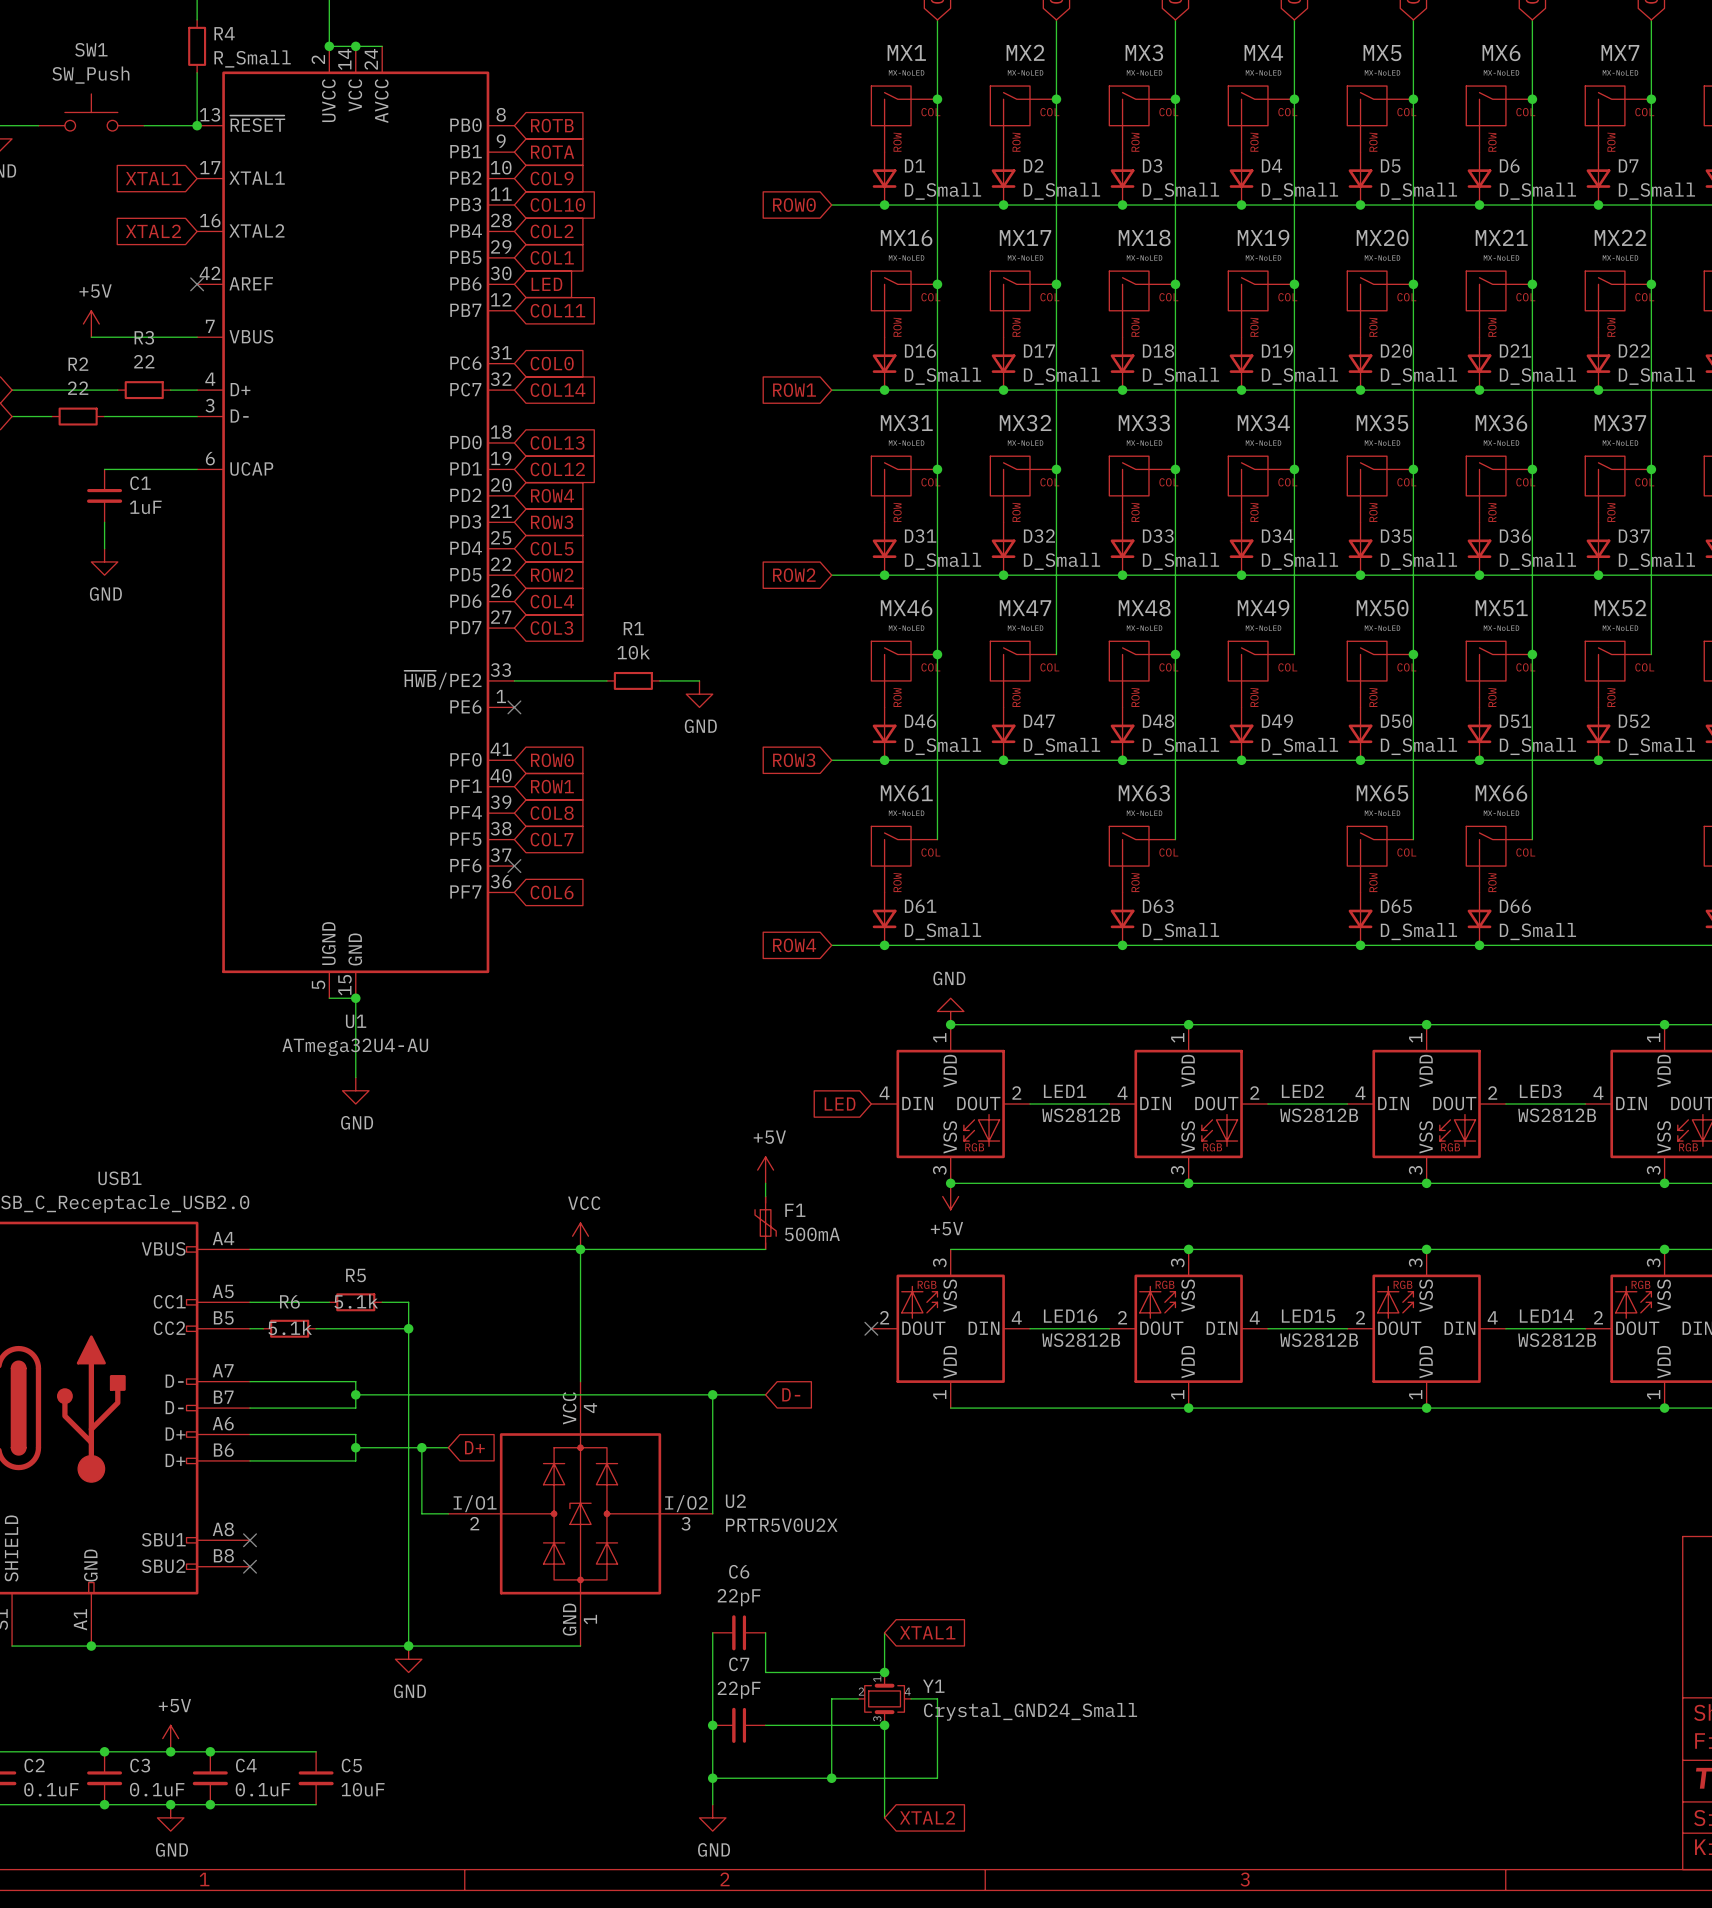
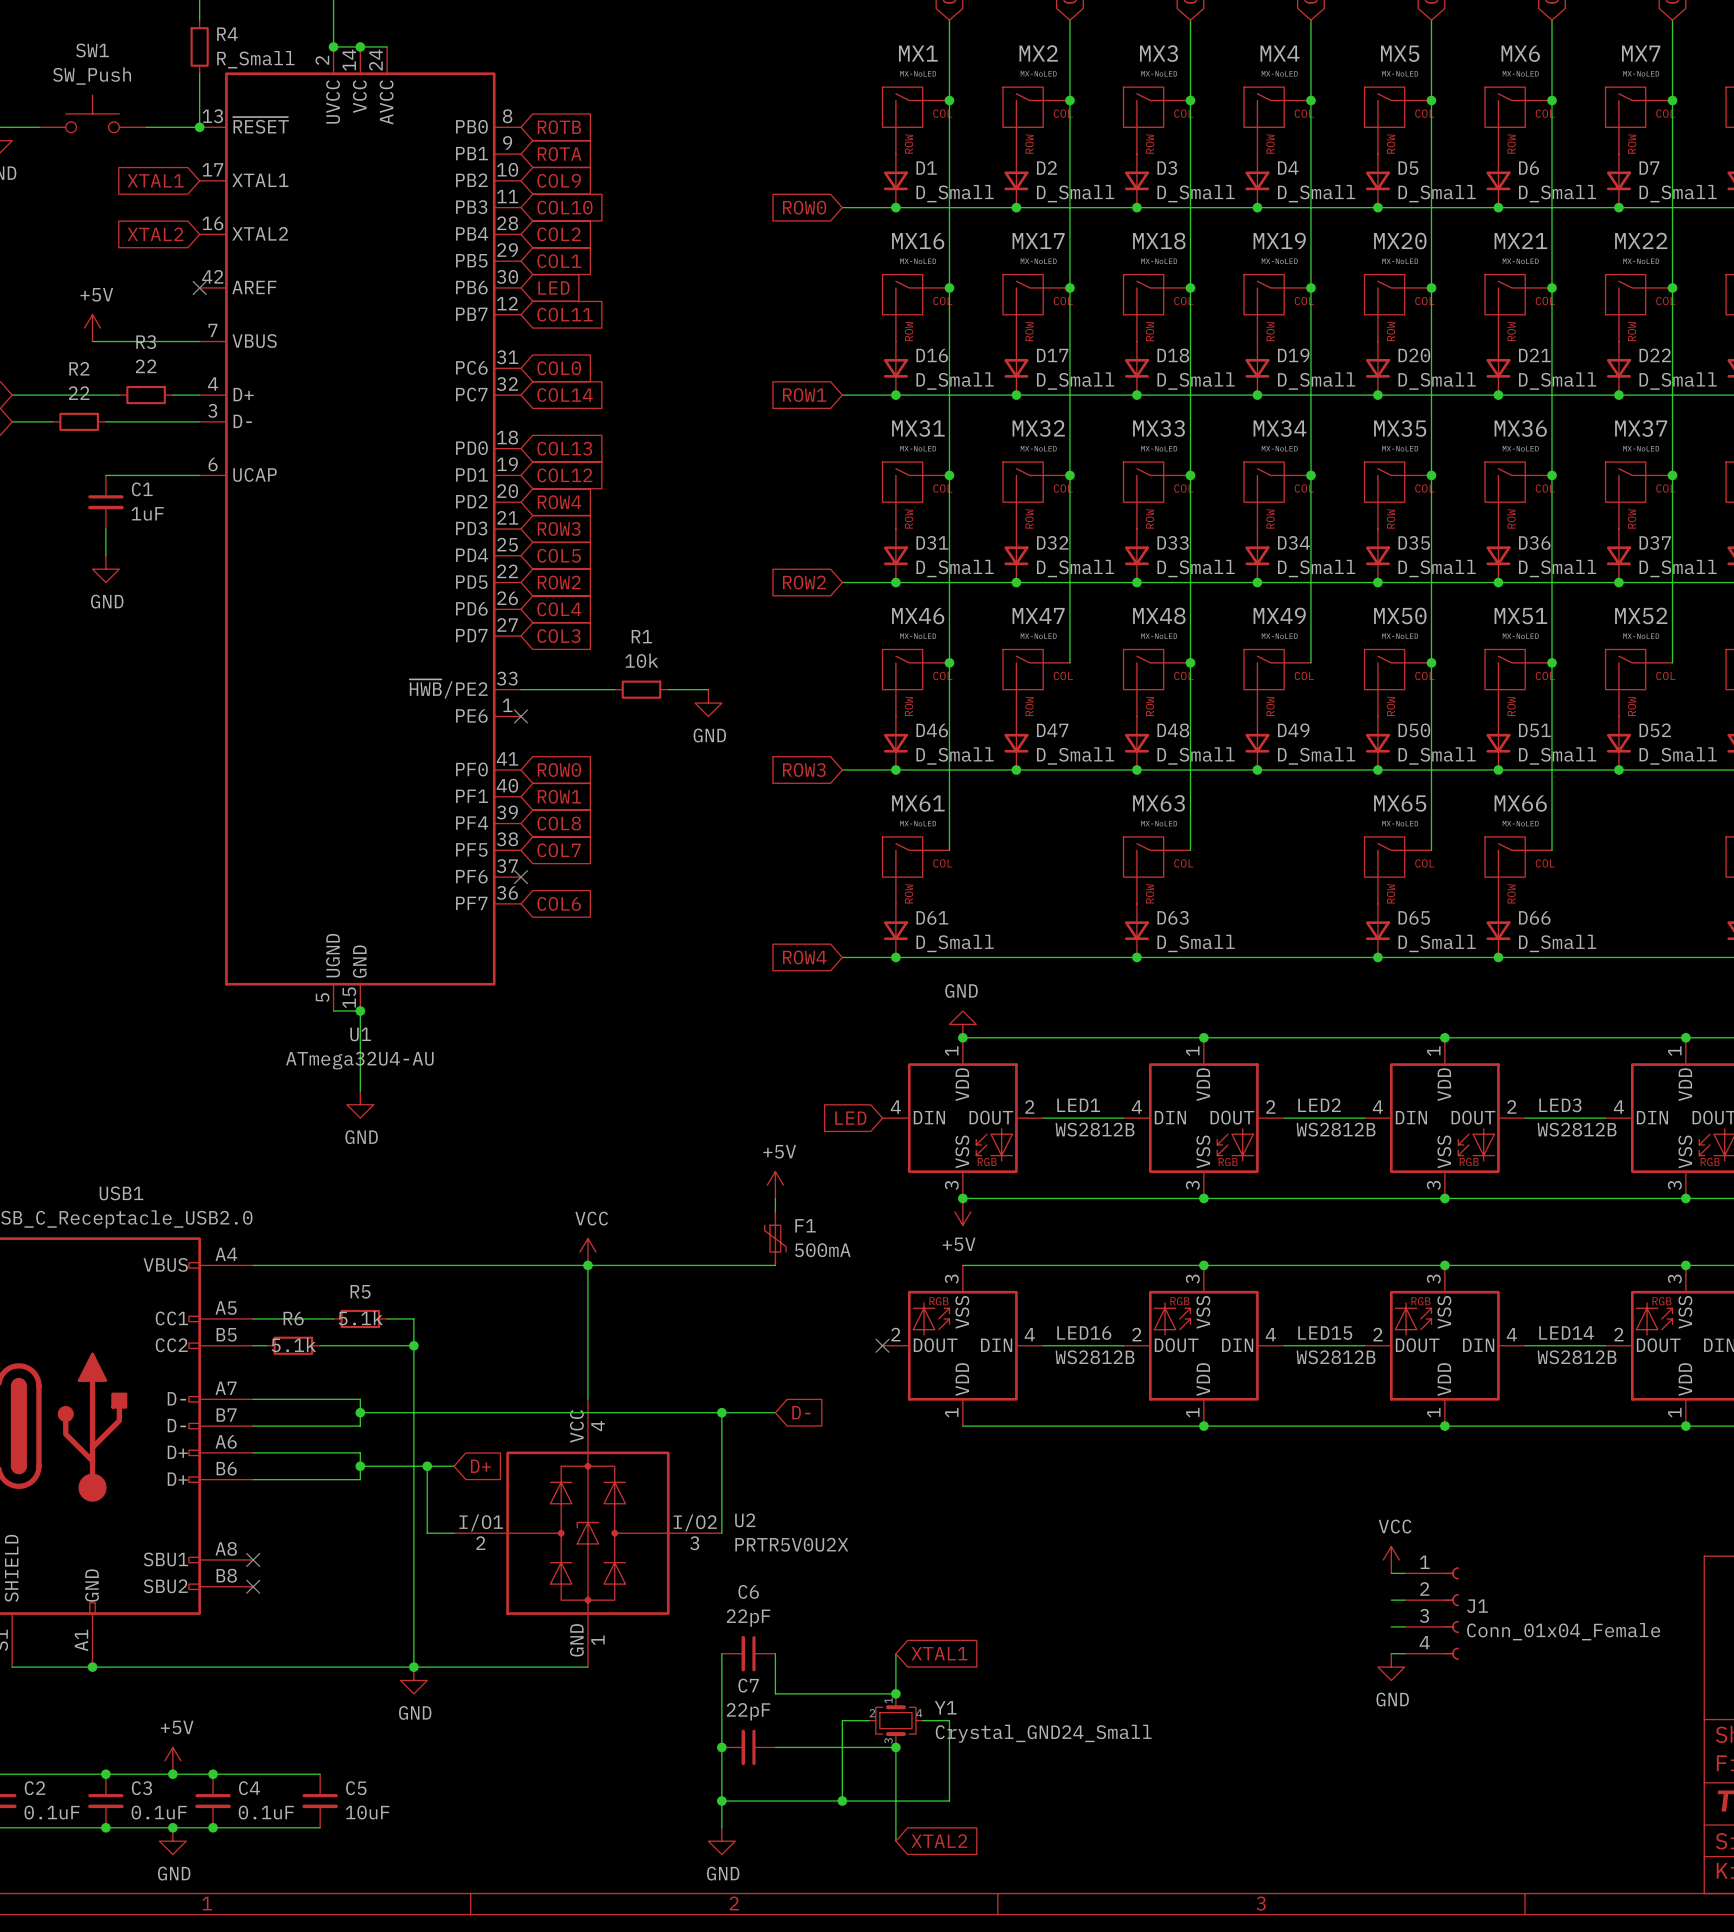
power symbol: none -> VCC (1391, 1559)
wire: none -> (1391, 1573) (1404, 1573)
wire: none -> (1391, 1600) (1404, 1600)
J1: none -> Conn_01x04_Female (1431, 1613)
wire: none -> (1391, 1626) (1404, 1626)
wire: none -> (1391, 1653) (1404, 1653)
power symbol: none -> GND (1391, 1667)

